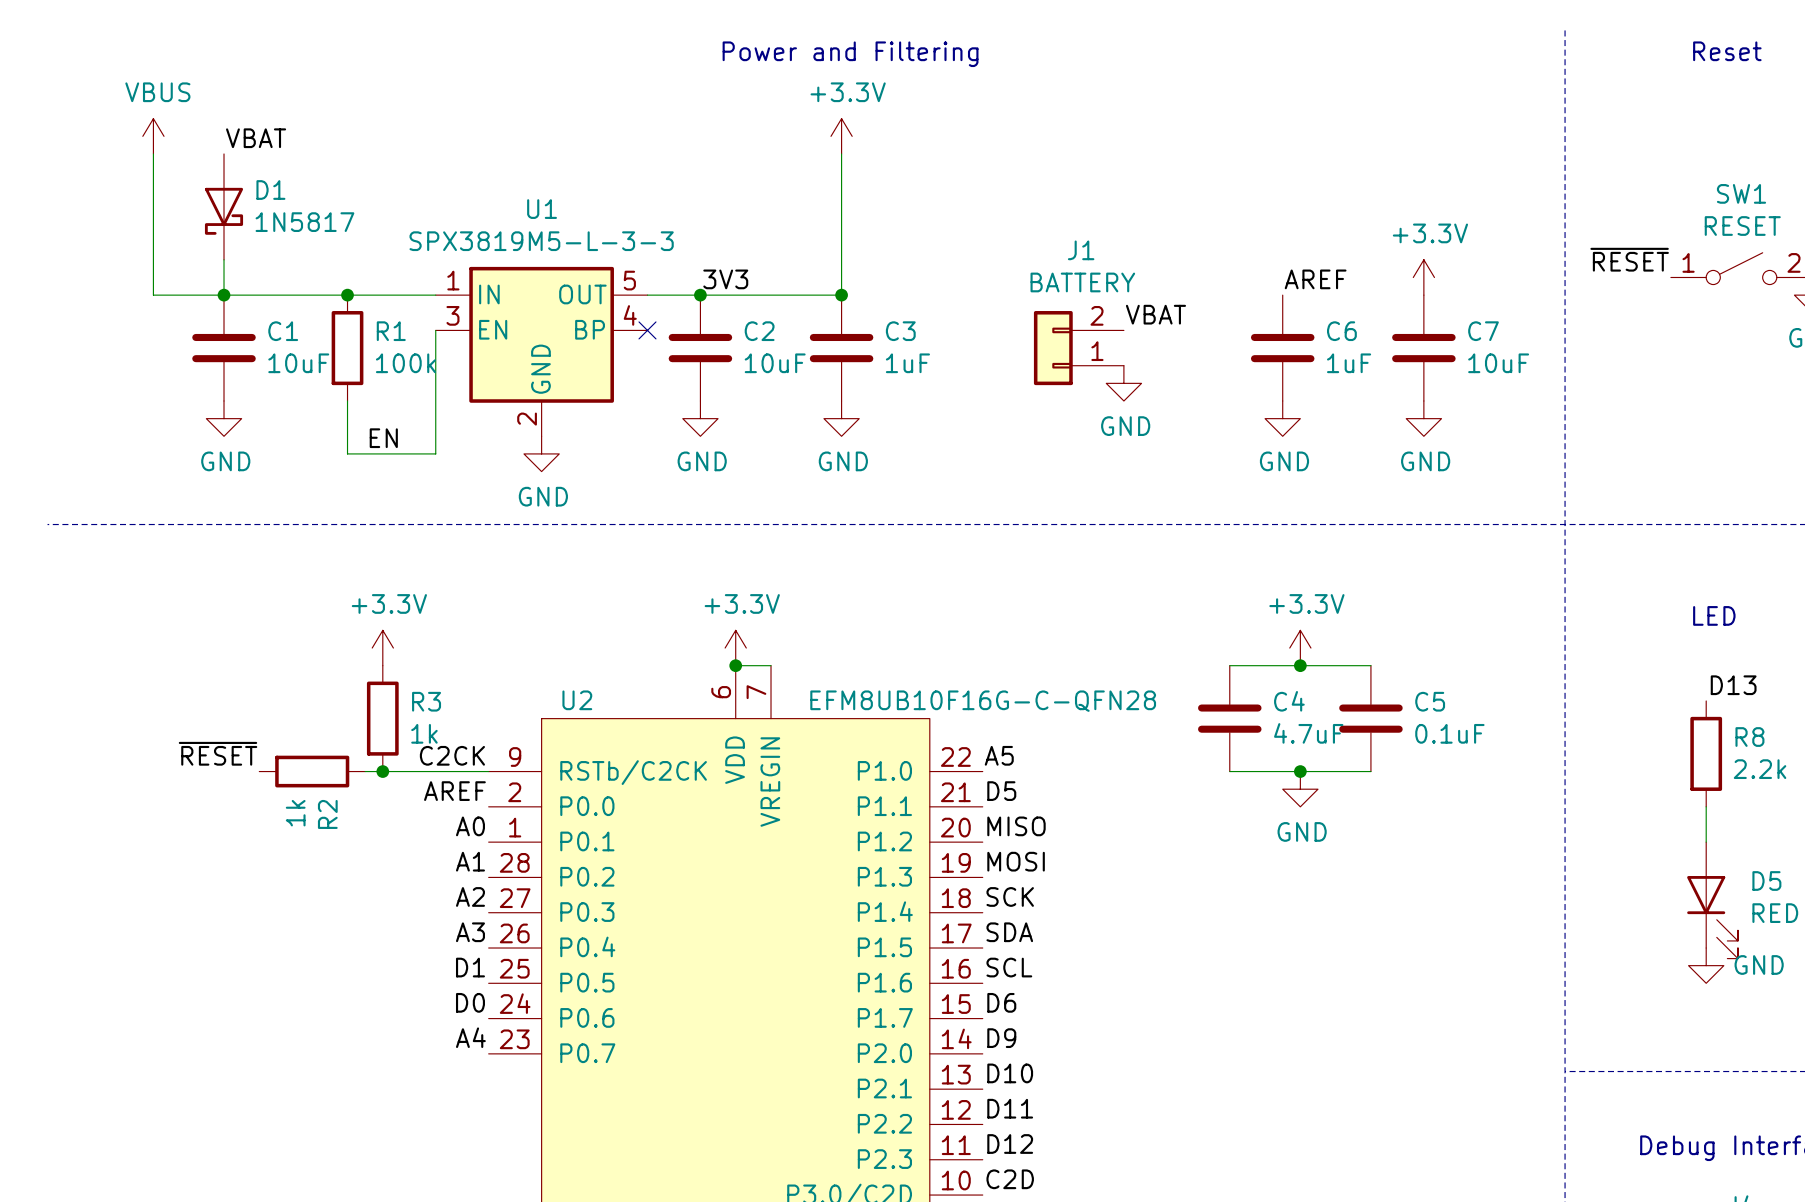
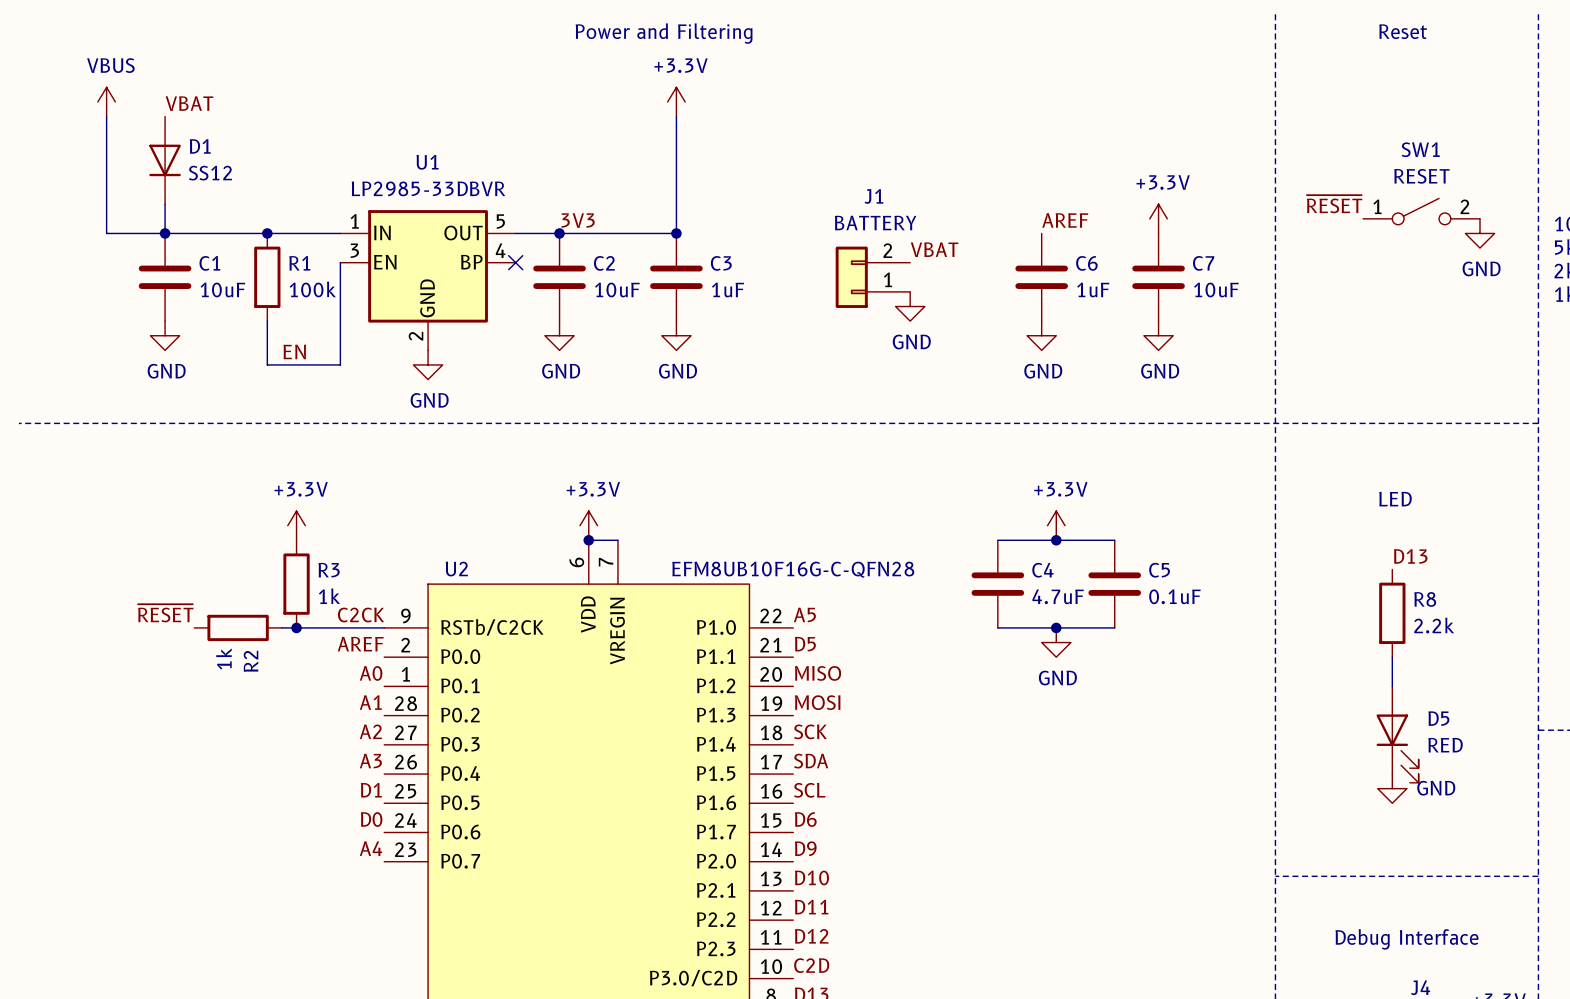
D1 symbol: [204, 153, 244, 260] -> [149, 116, 181, 205]
D1 value: 1N5817 (304, 222) -> SS12 (210, 173)
U1 value: SPX3819M5-L-3-3 (541, 241) -> LP2985-33DBVR (428, 188)

